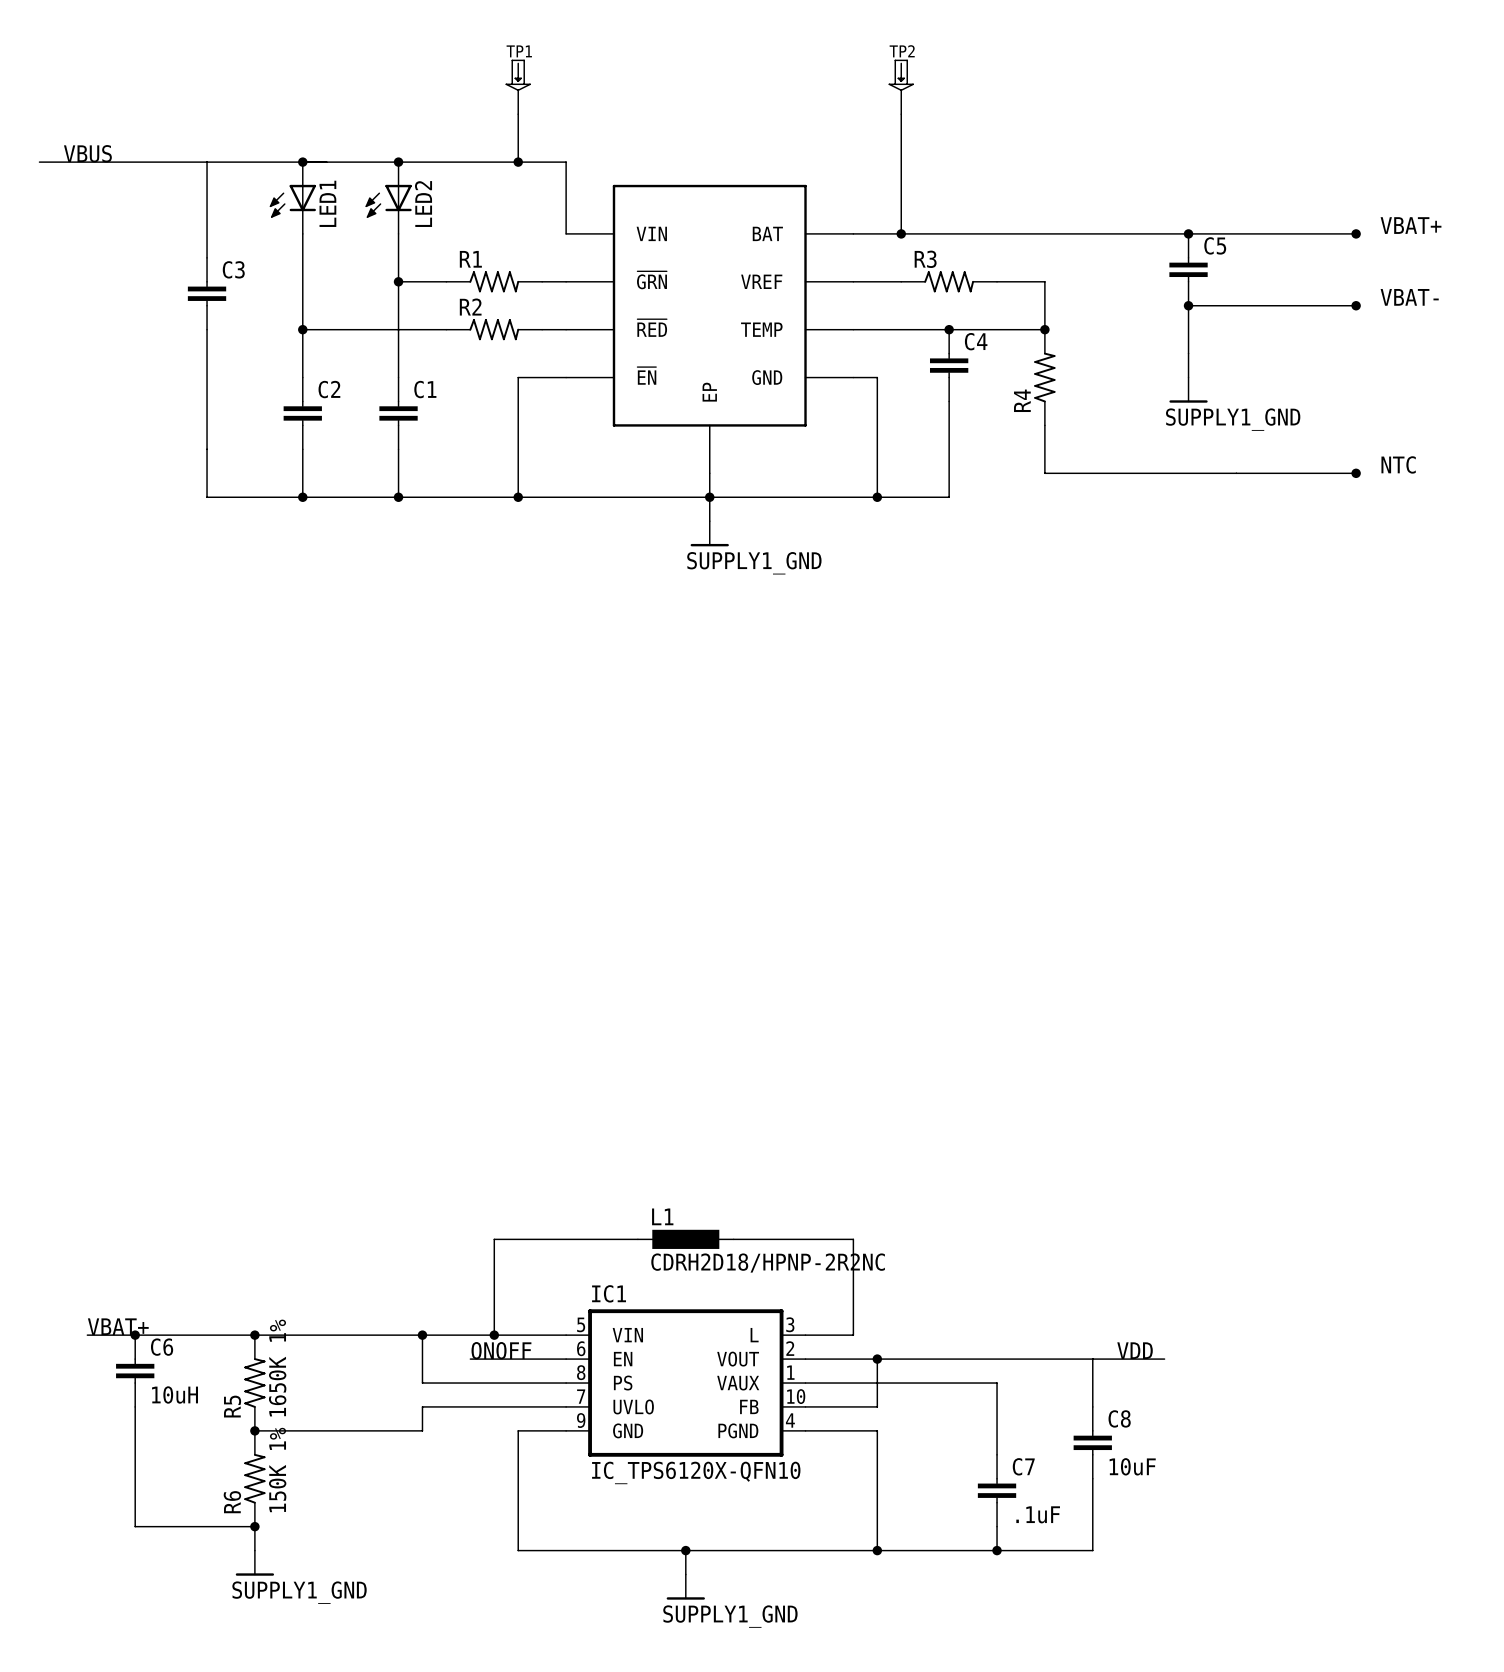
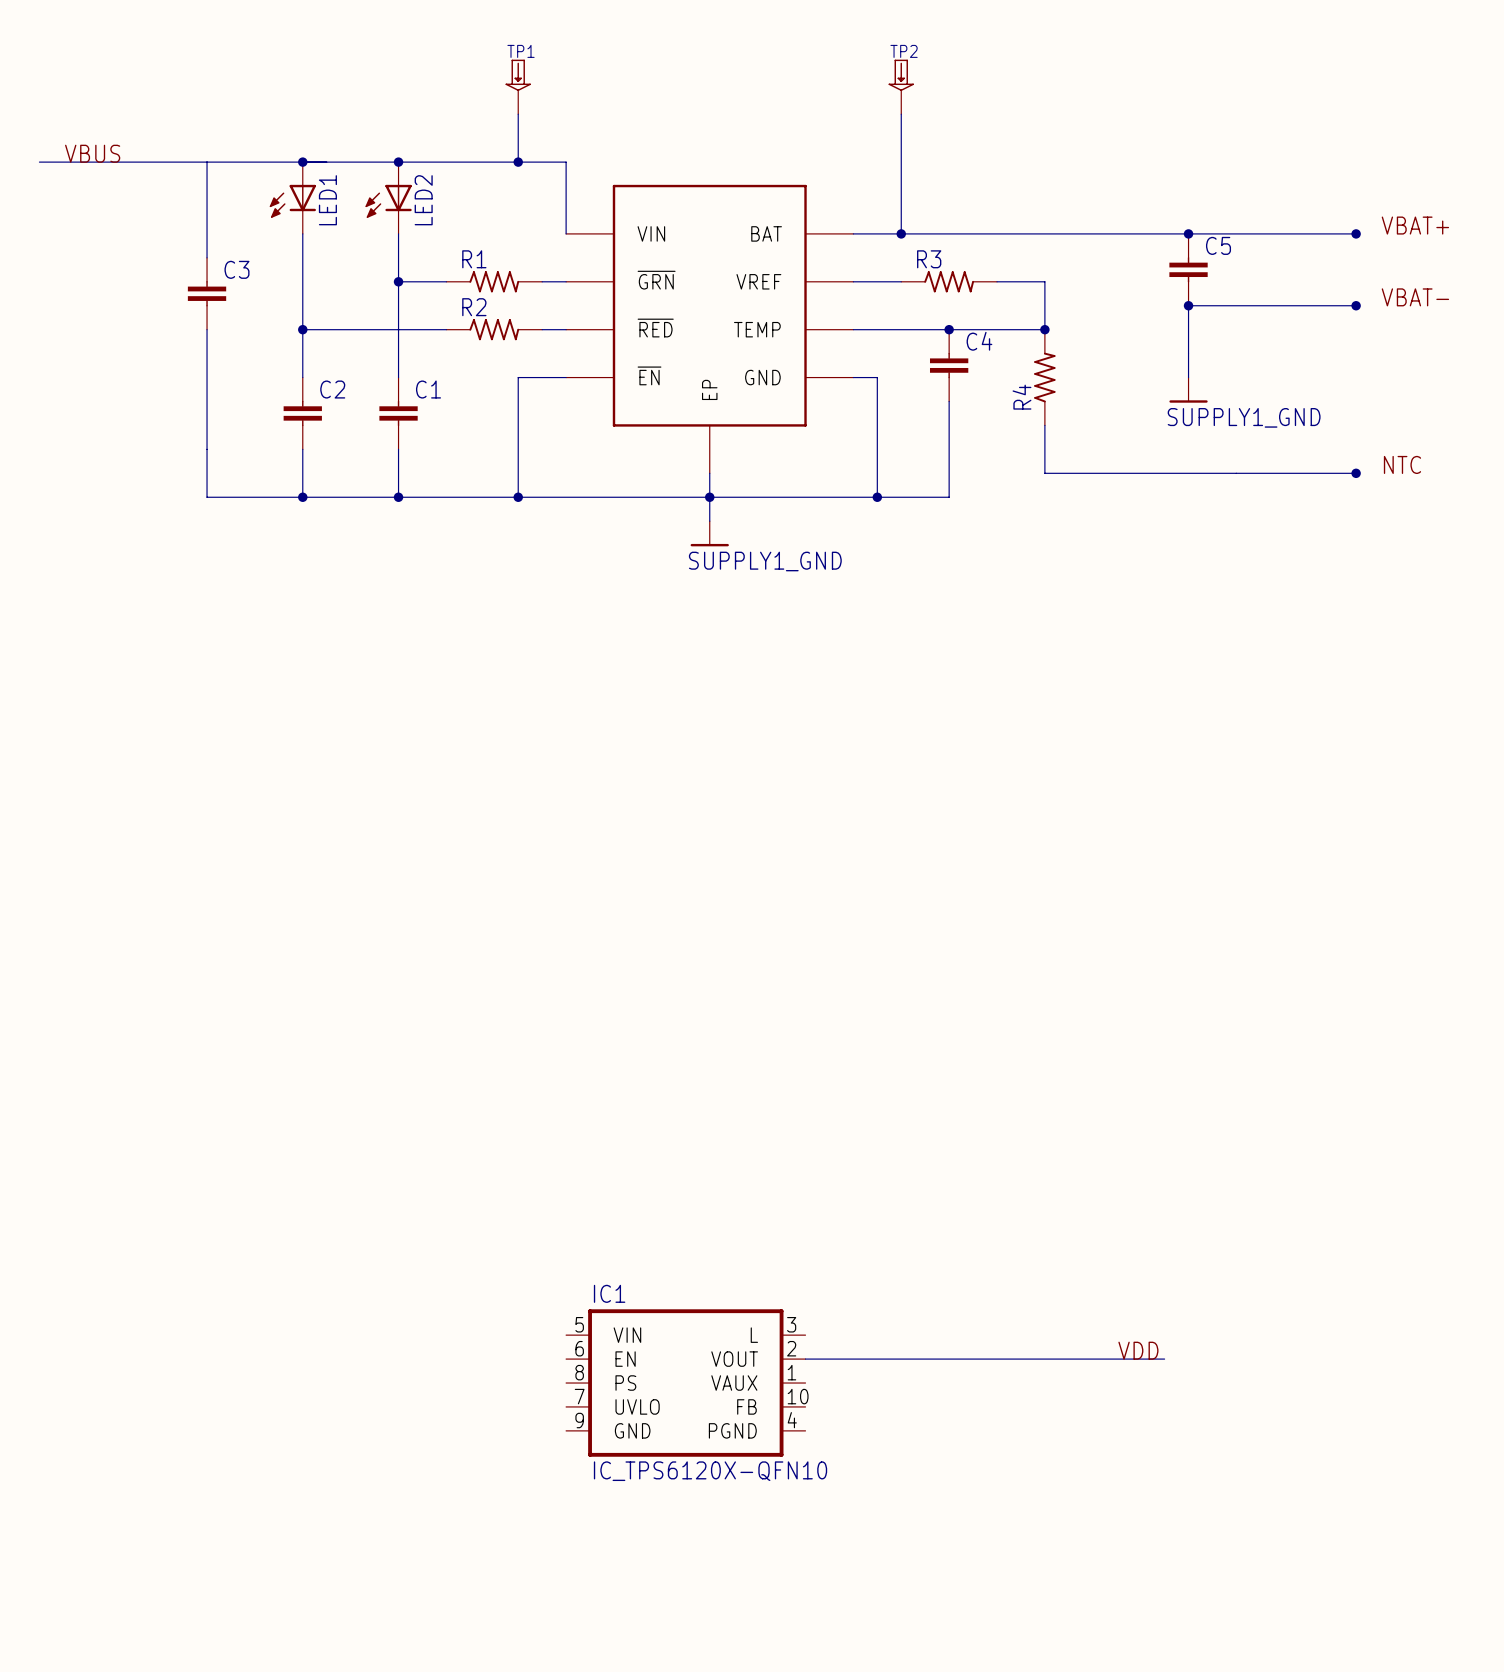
wire: (637, 1239) (494, 1239) (494, 1335) -> none
L1: CDRH2D18/HPNP-2R2NC (685, 1239) -> none
wire: (733, 1239) (853, 1239) (853, 1335) (805, 1335) -> none
label: VBAT+ (118, 1326) -> none
wire: (87, 1335) (566, 1335) -> none
junction: (135, 1335) -> none
junction: (254, 1335) -> none
wire: (422, 1335) (422, 1383) (566, 1383) -> none
junction: (422, 1335) -> none
junction: (494, 1335) -> none
label: ONOFF (501, 1350) -> none
wire: (470, 1359) (566, 1359) -> none
wire: (877, 1359) (877, 1406) (805, 1406) -> none
junction: (877, 1359) -> none
wire: (1092, 1359) (1092, 1406) -> none
C6: 10uH (135, 1371) -> none
R5: 1650K 1% (254, 1383) -> none
wire: (805, 1383) (997, 1383) (997, 1454) -> none
wire: (135, 1406) (135, 1526) (254, 1526) (254, 1550) -> none
wire: (566, 1406) (422, 1406) (422, 1430) (254, 1430) -> none
junction: (254, 1430) -> none
wire: (566, 1430) (518, 1430) (518, 1550) (1092, 1550) (1092, 1478) -> none
wire: (805, 1430) (877, 1430) (877, 1550) -> none
C8: 10uF (1092, 1442) -> none
R6: 150K 1% (254, 1478) -> none
C7: .1uF (997, 1490) -> none
junction: (254, 1526) -> none
wire: (997, 1526) (997, 1550) -> none
wire: (685, 1550) (685, 1574) -> none
junction: (685, 1550) -> none
junction: (877, 1550) -> none
junction: (997, 1550) -> none
power symbol: SUPPLY1_GND (254, 1563) -> none
power symbol: SUPPLY1_GND (685, 1587) -> none

